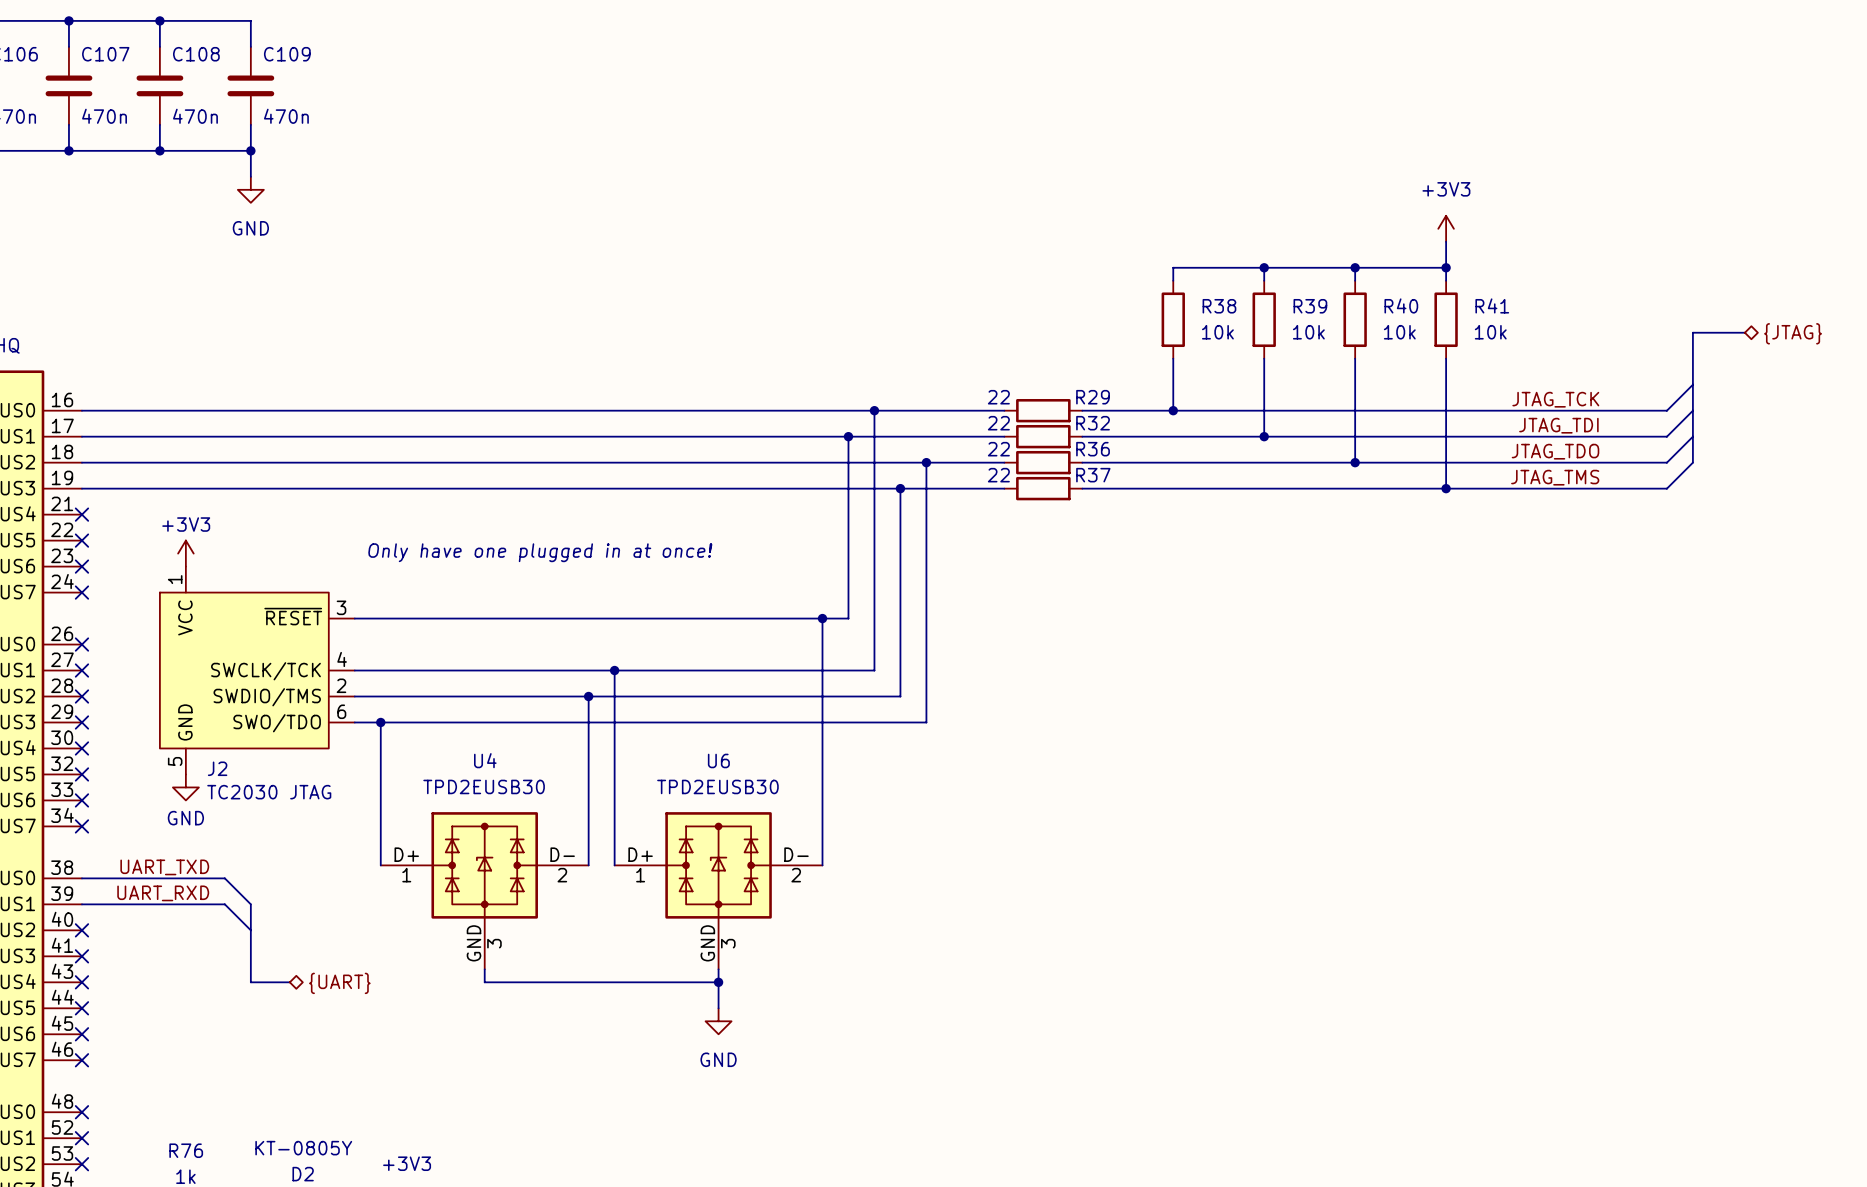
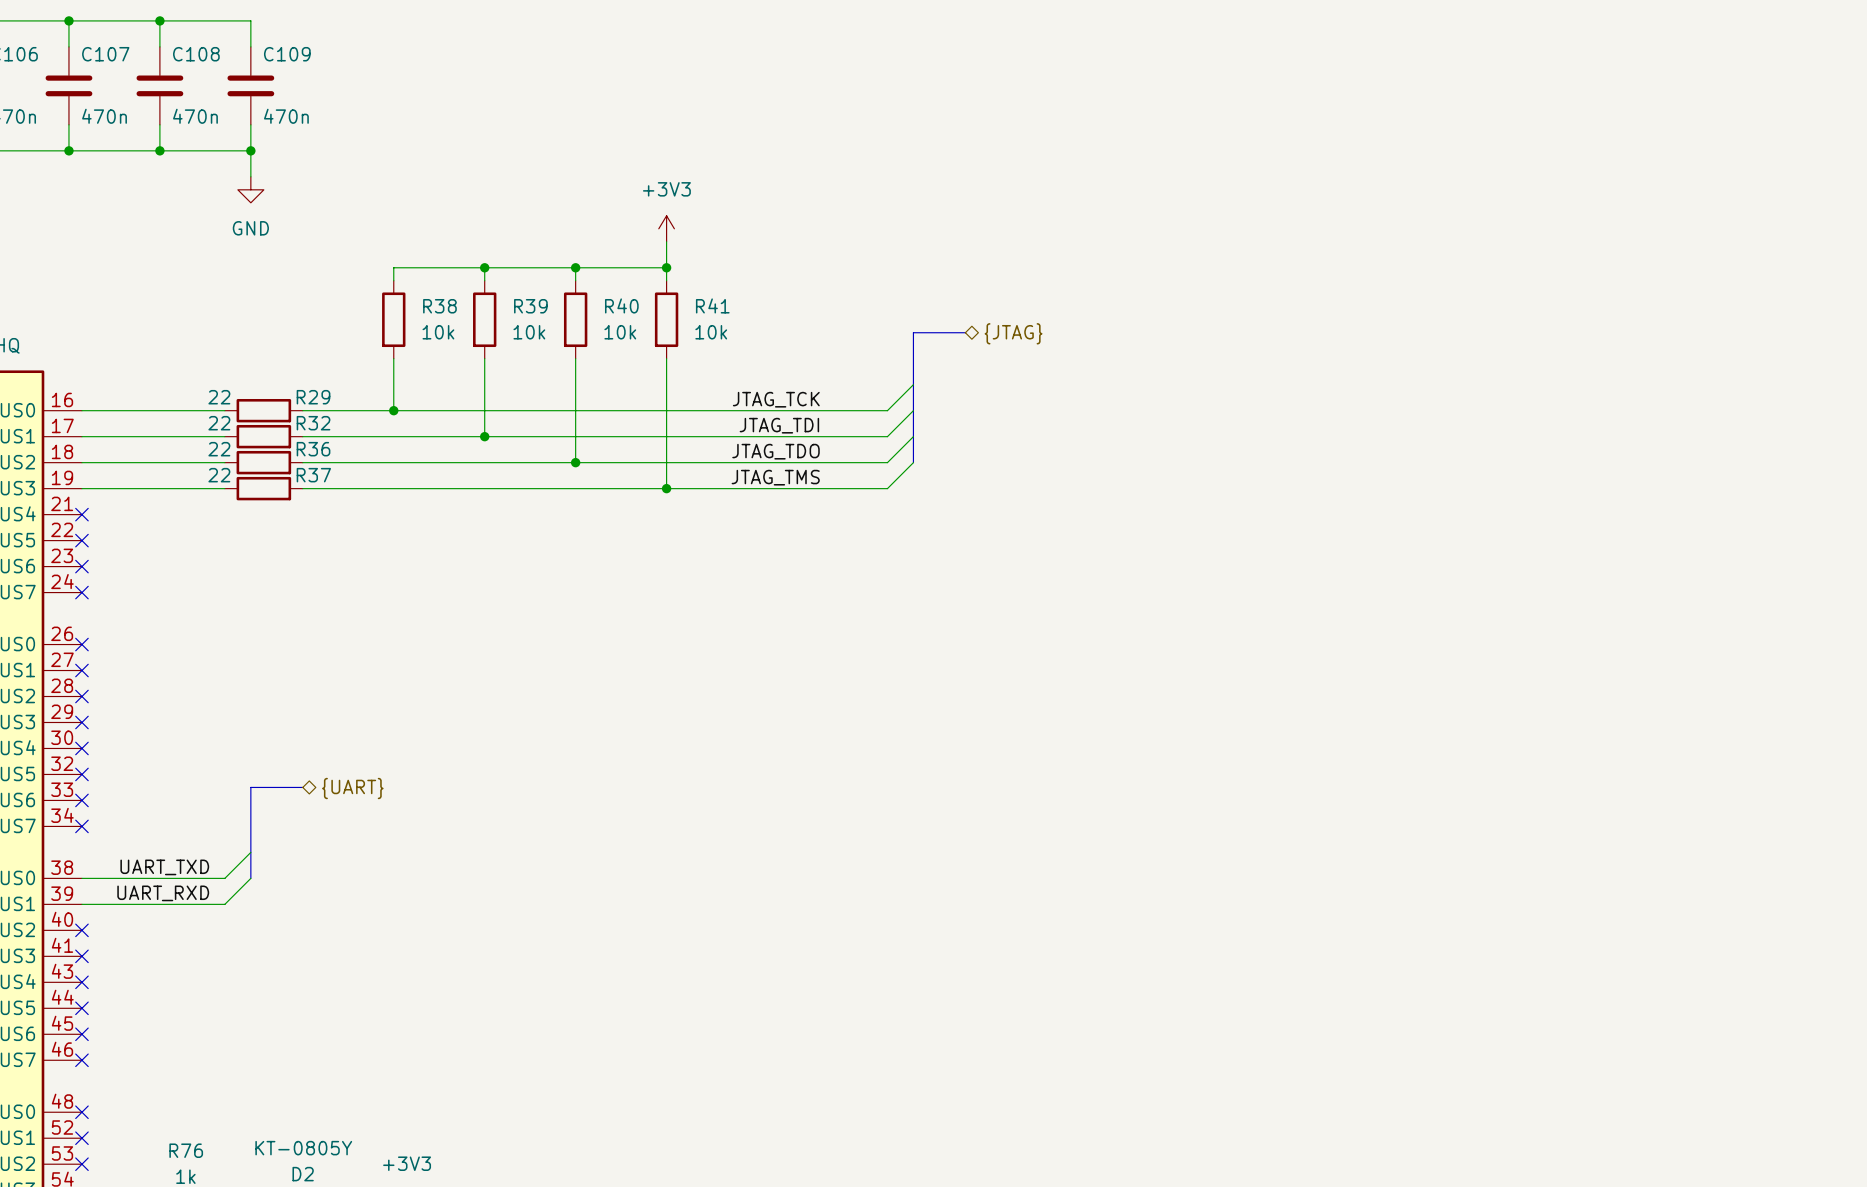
power symbol: none -> +3V3 (666, 228)
power symbol: +3V3 (1446, 228) -> none
wire: none -> (666, 241) (666, 280)
wire: (1446, 241) (1446, 280) -> none
wire: none -> (484, 267) (484, 280)
junction: none -> (484, 267)
wire: none -> (575, 267) (575, 280)
junction: none -> (575, 267)
wire: none -> (666, 267) (393, 267) (393, 280)
junction: none -> (666, 267)
wire: (1264, 267) (1264, 280) -> none
junction: (1264, 267) -> none
wire: (1355, 267) (1355, 280) -> none
junction: (1355, 267) -> none
wire: (1446, 267) (1173, 267) (1173, 280) -> none
junction: (1446, 267) -> none
R38 position: (1173, 319) -> (393, 319)
R39 position: (1264, 319) -> (484, 319)
R40 position: (1355, 319) -> (575, 319)
R41 position: (1446, 319) -> (666, 319)
bus: none -> (965, 332) (913, 332) (913, 462)
bus: (1744, 332) (1692, 332) (1692, 462) -> none
hierarchical label: none -> {JTAG} (1013, 333)
hierarchical label: {JTAG} (1793, 333) -> none
wire: none -> (393, 358) (393, 410)
wire: none -> (484, 358) (484, 436)
wire: none -> (575, 358) (575, 462)
wire: none -> (666, 358) (666, 488)
wire: (1173, 358) (1173, 410) -> none
wire: (1264, 358) (1264, 436) -> none
wire: (1355, 358) (1355, 462) -> none
wire: (1446, 358) (1446, 488) -> none
wire: (1692, 384) (1666, 410) (1082, 410) -> none
label: none -> JTAG_TCK (776, 399)
label: JTAG_TCK (1555, 399) -> none
wire: (224, 410) (302, 410) -> none
junction: none -> (393, 410)
wire: (874, 410) (874, 670) (354, 670) -> none
junction: (874, 410) -> none
wire: (887, 410) (1004, 410) -> (887, 410) (913, 384)
R29 position: (1043, 410) -> (263, 410)
junction: (1173, 410) -> none
wire: (1692, 410) (1666, 436) (1082, 436) -> none
label: none -> JTAG_TDI (779, 425)
label: JTAG_TDI (1558, 425) -> none
wire: (224, 436) (302, 436) -> none
junction: none -> (484, 436)
wire: (848, 436) (848, 618) (354, 618) -> none
junction: (848, 436) -> none
wire: (887, 436) (1004, 436) -> (887, 436) (913, 410)
R32 position: (1043, 436) -> (263, 436)
junction: (1264, 436) -> none
wire: (1692, 436) (1666, 462) (1082, 462) -> none
label: none -> JTAG_TDO (775, 451)
label: JTAG_TDO (1555, 451) -> none
wire: (224, 462) (302, 462) -> none
junction: none -> (575, 462)
wire: (887, 462) (1004, 462) -> (887, 462) (913, 436)
wire: (926, 462) (926, 722) (354, 722) -> none
junction: (926, 462) -> none
R36 position: (1043, 462) -> (263, 462)
junction: (1355, 462) -> none
wire: (1692, 462) (1666, 488) (1082, 488) -> none
label: none -> JTAG_TMS (775, 477)
label: JTAG_TMS (1555, 477) -> none
wire: (224, 488) (302, 488) -> none
junction: none -> (666, 488)
wire: (887, 488) (1004, 488) -> (887, 488) (913, 462)
wire: (900, 488) (900, 696) (354, 696) -> none
junction: (900, 488) -> none
R37 position: (1043, 488) -> (263, 488)
junction: (1446, 488) -> none
text: Only have one plugged in at once! (540, 552) -> none
power symbol: +3V3 (185, 553) -> none
wire: (822, 618) (822, 865) -> none
junction: (822, 618) -> none
J2: (257, 670) -> none
wire: (614, 670) (614, 865) -> none
junction: (614, 670) -> none
wire: (588, 696) (588, 865) -> none
junction: (588, 696) -> none
wire: (380, 722) (380, 865) -> none
junction: (380, 722) -> none
power symbol: GND (185, 787) -> none
bus: none -> (302, 787) (250, 787) (250, 878)
wire: (224, 878) (250, 904) -> (224, 878) (250, 852)
U4: TPD2EUSB30 (484, 890) -> none
U6: TPD2EUSB30 (718, 890) -> none
wire: (224, 904) (250, 930) -> (224, 904) (250, 878)
bus: (250, 904) (250, 982) (289, 982) -> none
wire: (484, 969) (484, 982) (718, 982) -> none
wire: (718, 969) (718, 1008) -> none
junction: (718, 982) -> none
hierarchical label position: {UART} (339, 983) -> {UART} (352, 788)
power symbol: GND (718, 1021) -> none

